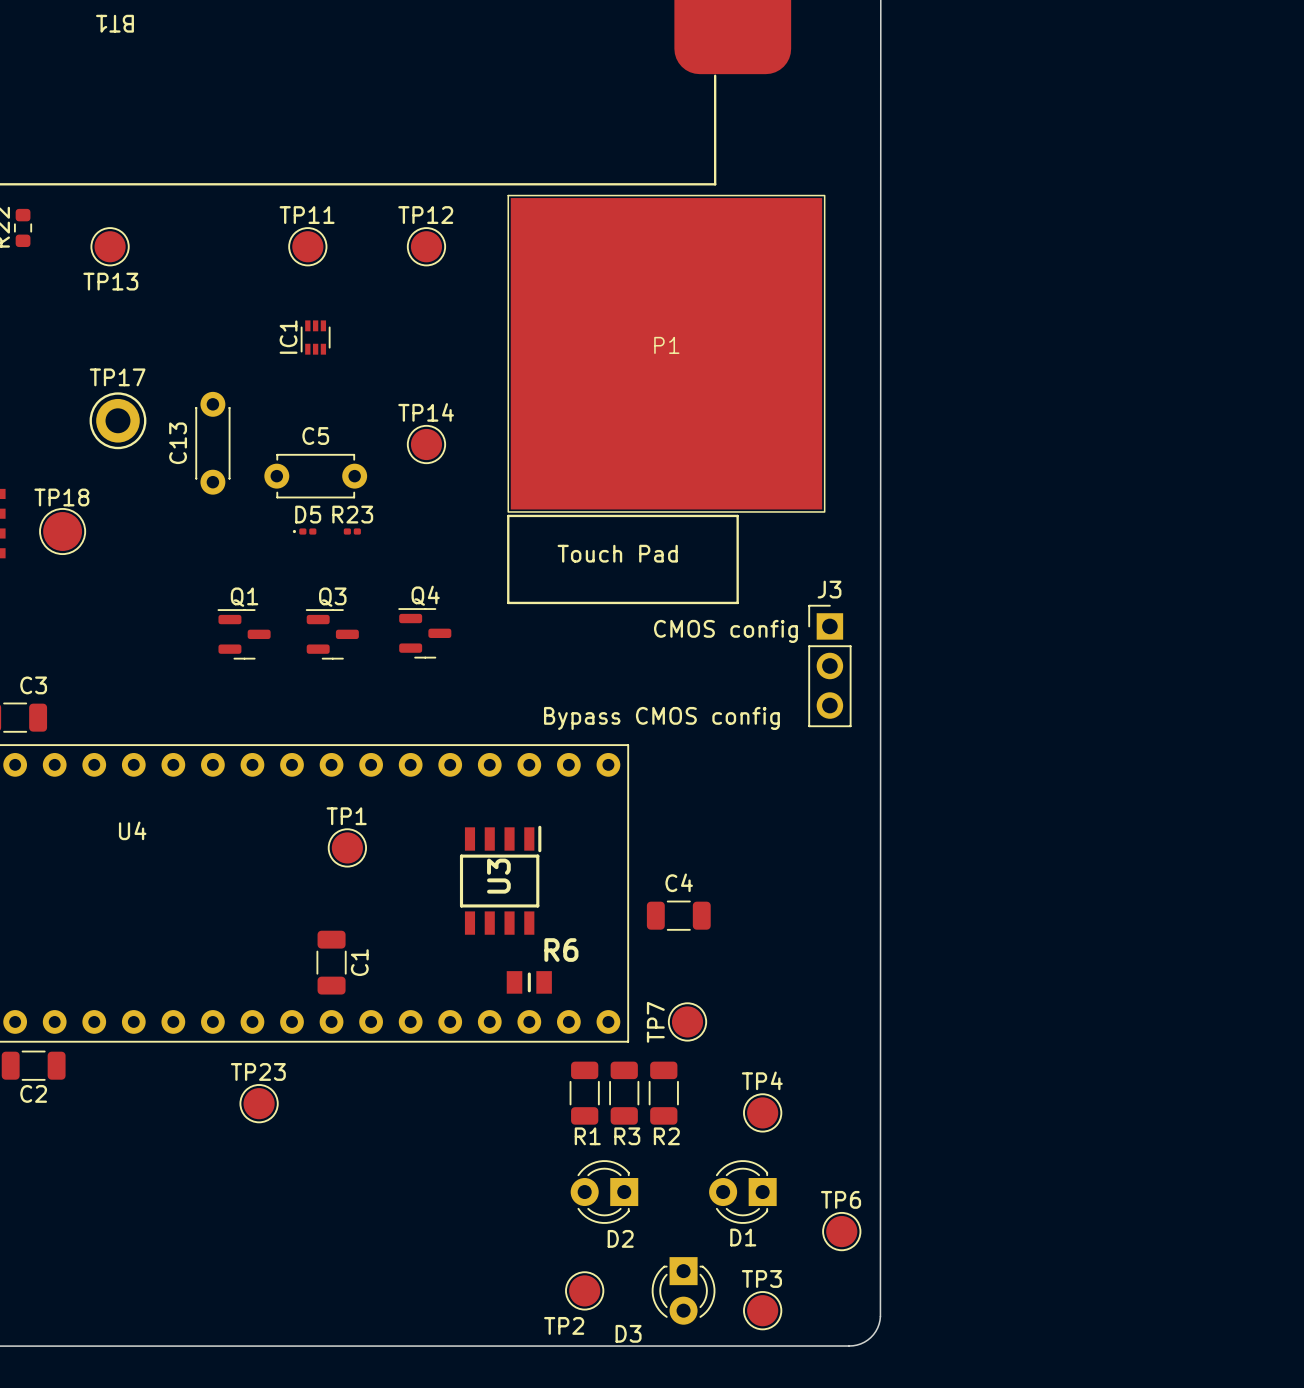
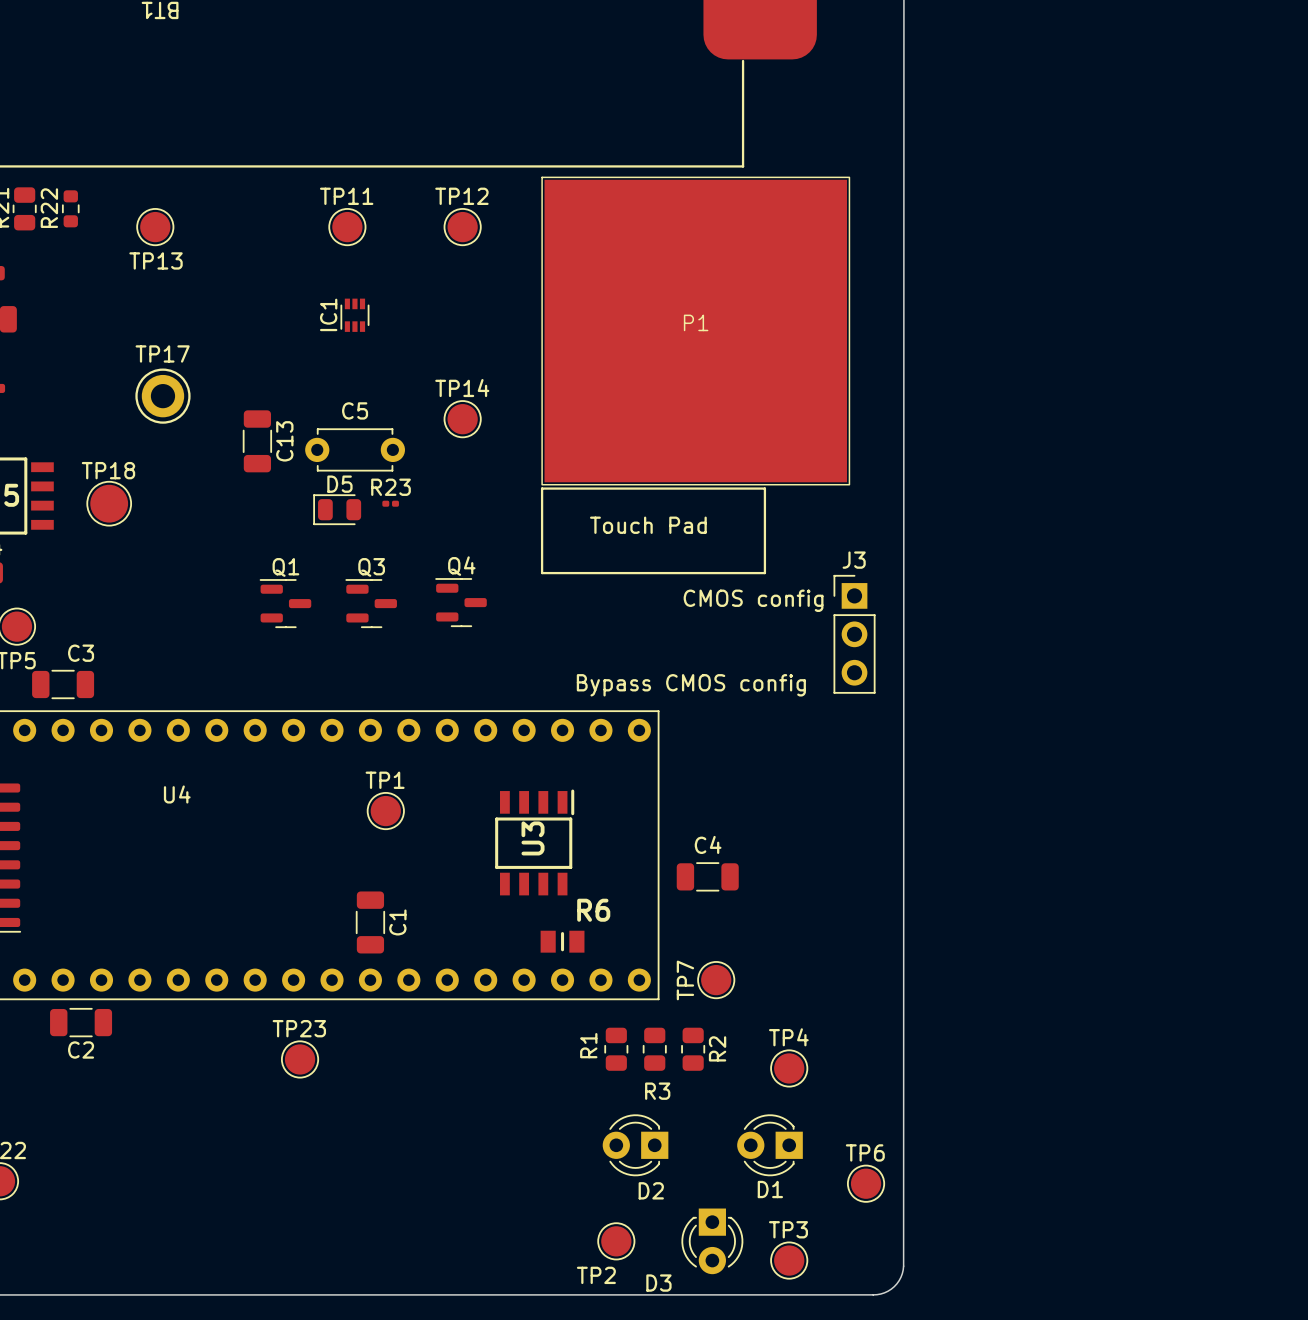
C13 footprint: [195, 391, 231, 495] -> [242, 410, 273, 473]
C13 name position: C13 (178, 443) -> C13 (284, 441)
D5 footprint: [292, 528, 317, 535] -> [313, 494, 362, 526]
R1 footprint: [569, 1061, 600, 1125] -> [604, 1027, 629, 1071]
R3 footprint: [609, 1061, 640, 1125] -> [642, 1027, 667, 1071]
R2 footprint: [648, 1061, 679, 1125] -> [681, 1027, 706, 1071]
R1 name rotation: 0° (587, 1136) -> 90° counterclockwise (588, 1045)
R1 name position: R1 (587, 1136) -> R1 (588, 1045)
R2 name rotation: 0° (666, 1136) -> 90° counterclockwise (717, 1048)
R2 name position: R2 (666, 1136) -> R2 (717, 1048)

